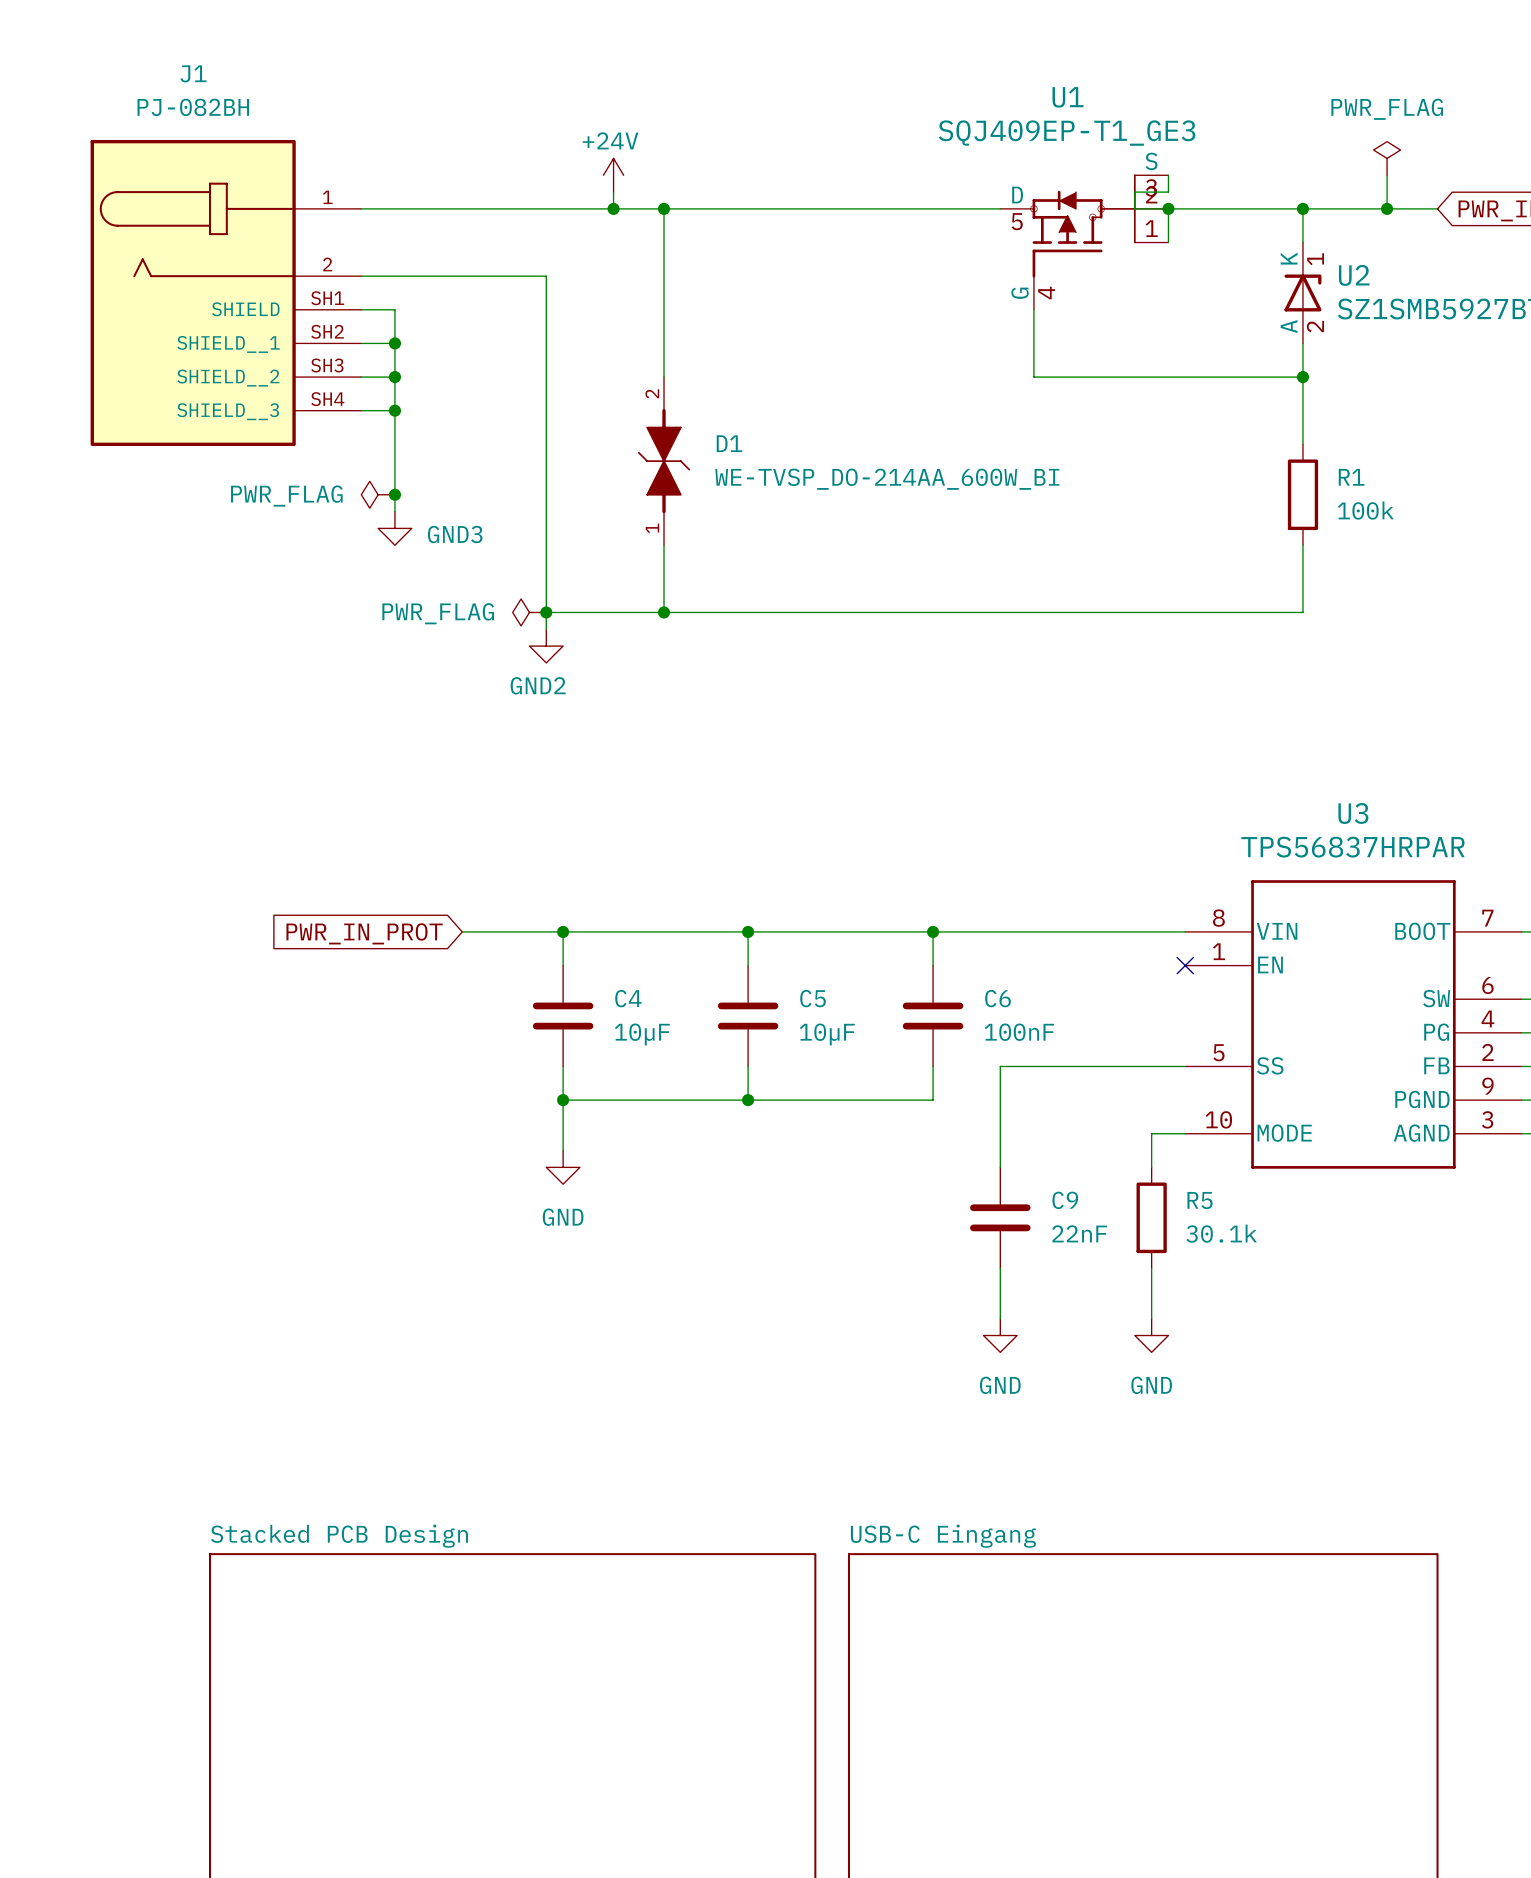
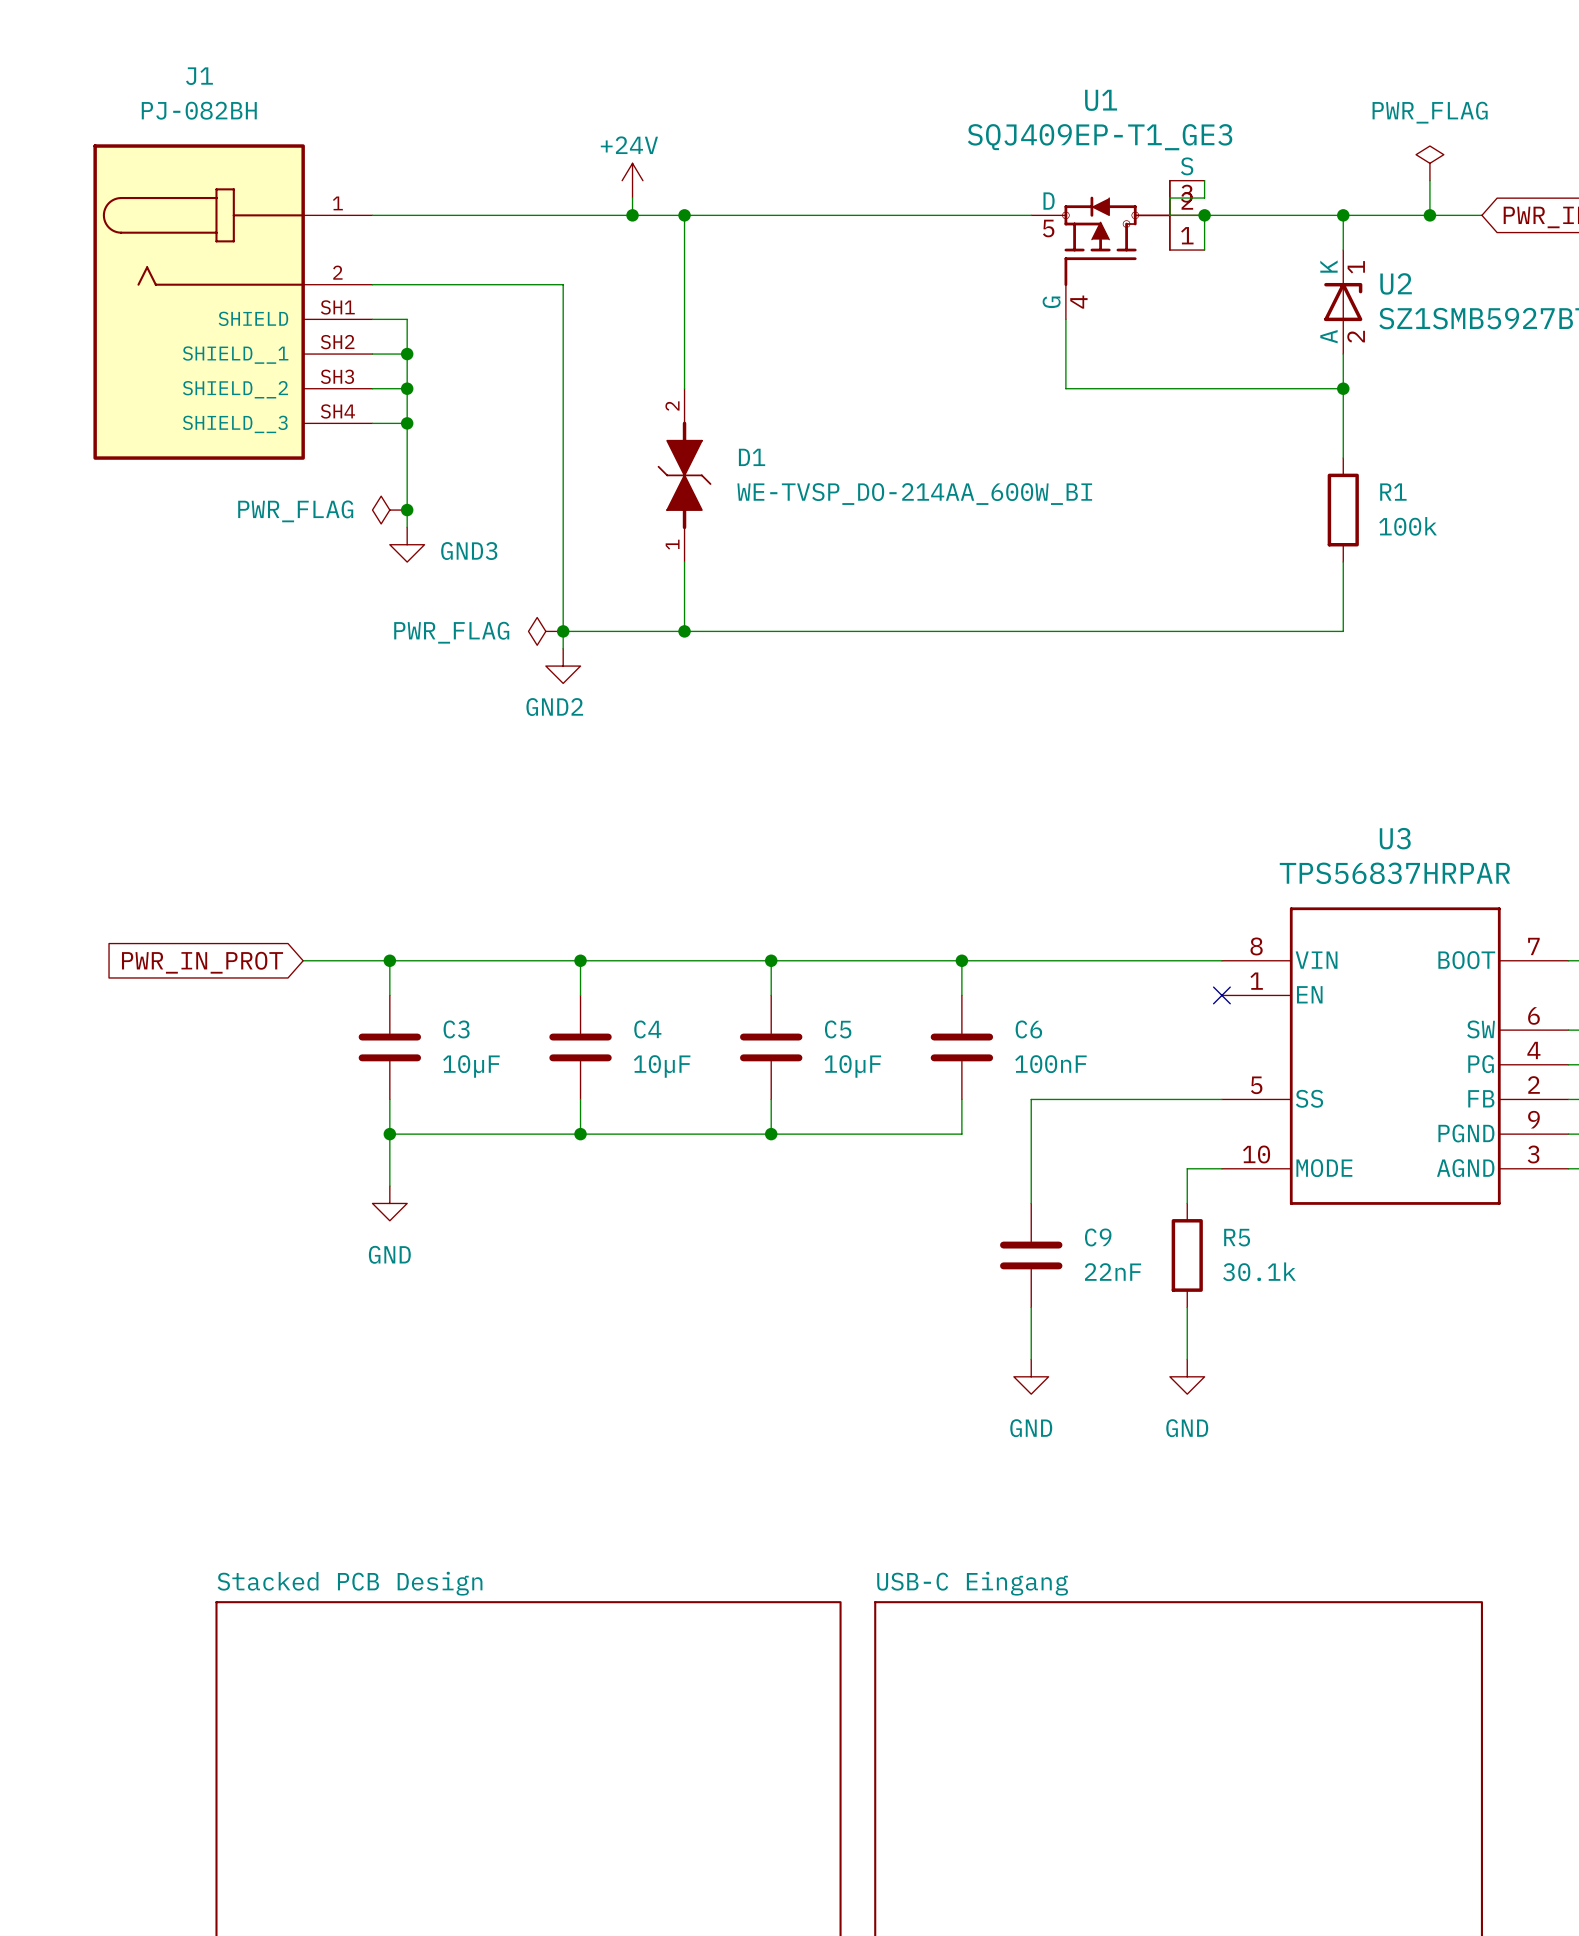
wire: none -> (303, 960) (476, 960)
wire: none -> (389, 960) (389, 995)
junction: none -> (389, 960)
global label position: PWR_IN_PROT (364, 933) -> PWR_IN_PROT (202, 962)
C3: none -> 10µF (389, 1047)
wire: none -> (389, 1099) (389, 1186)
junction: none -> (389, 1134)
wire: (563, 1100) (563, 1150) -> (580, 1134) (389, 1134)
power symbol position: GND (563, 1167) -> GND (389, 1203)

